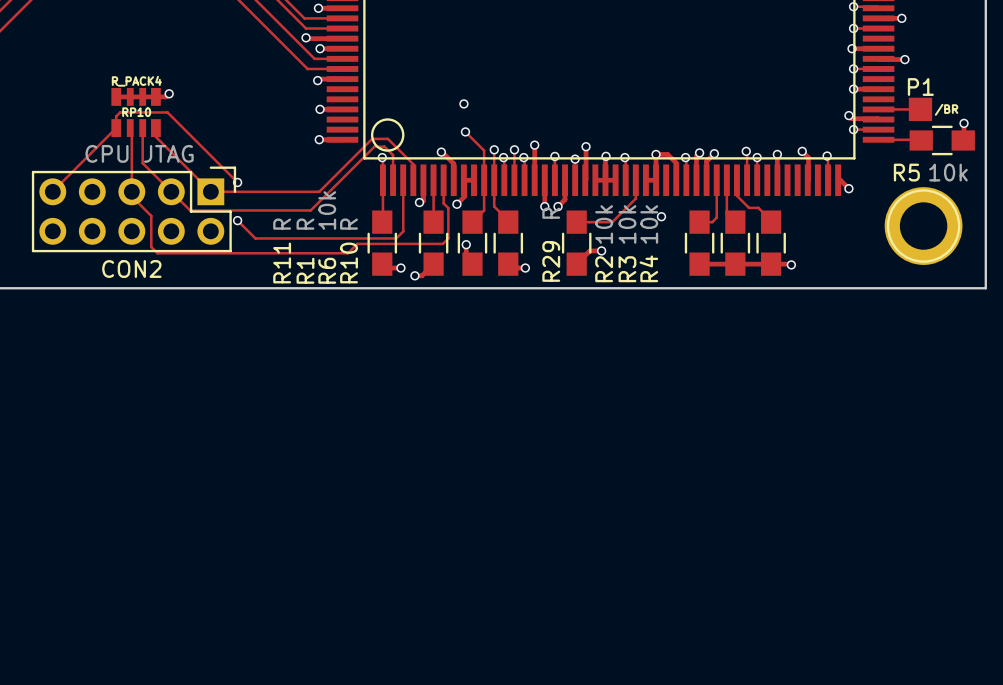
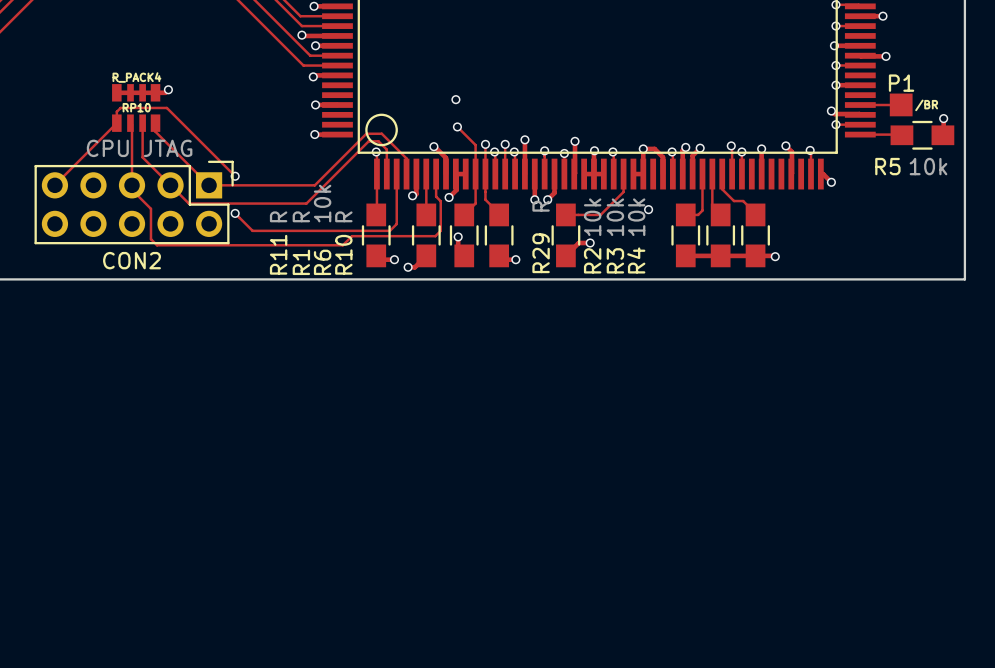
part: (923, 226) -> none

